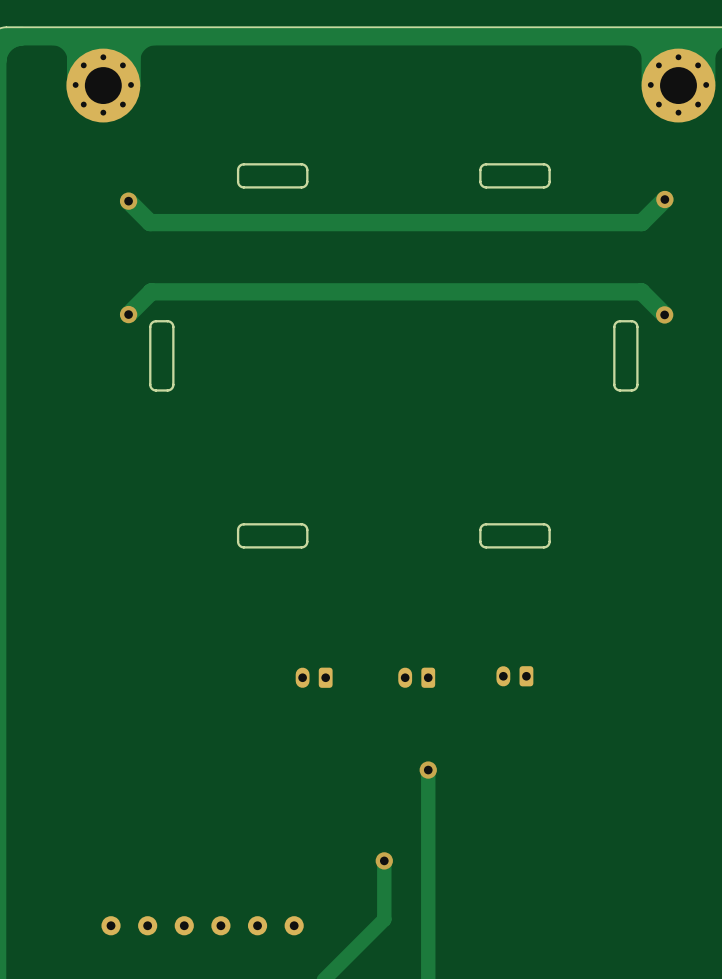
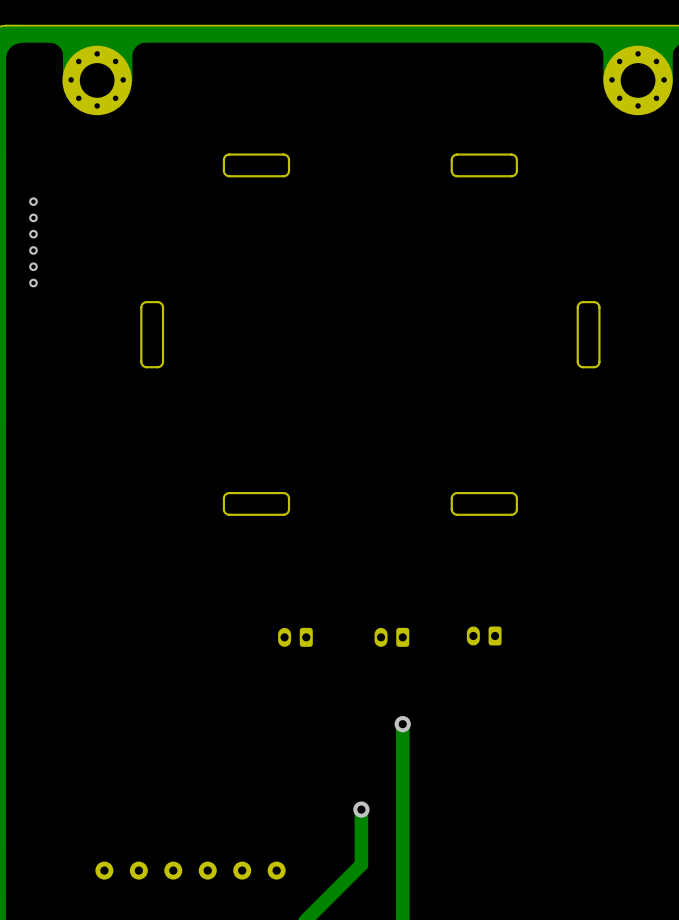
track: (664, 199) (641, 222) (150, 222) (128, 201) -> none
via: (664, 199) -> none
via: (128, 201) -> none
via: none -> (33, 201)
via: none -> (33, 217)
via: none -> (33, 234)
via: none -> (33, 250)
via: none -> (33, 266)
via: none -> (33, 283)
track: (128, 314) (151, 291) (641, 291) (664, 314) -> none
via: (128, 314) -> none
via: (664, 314) -> none

